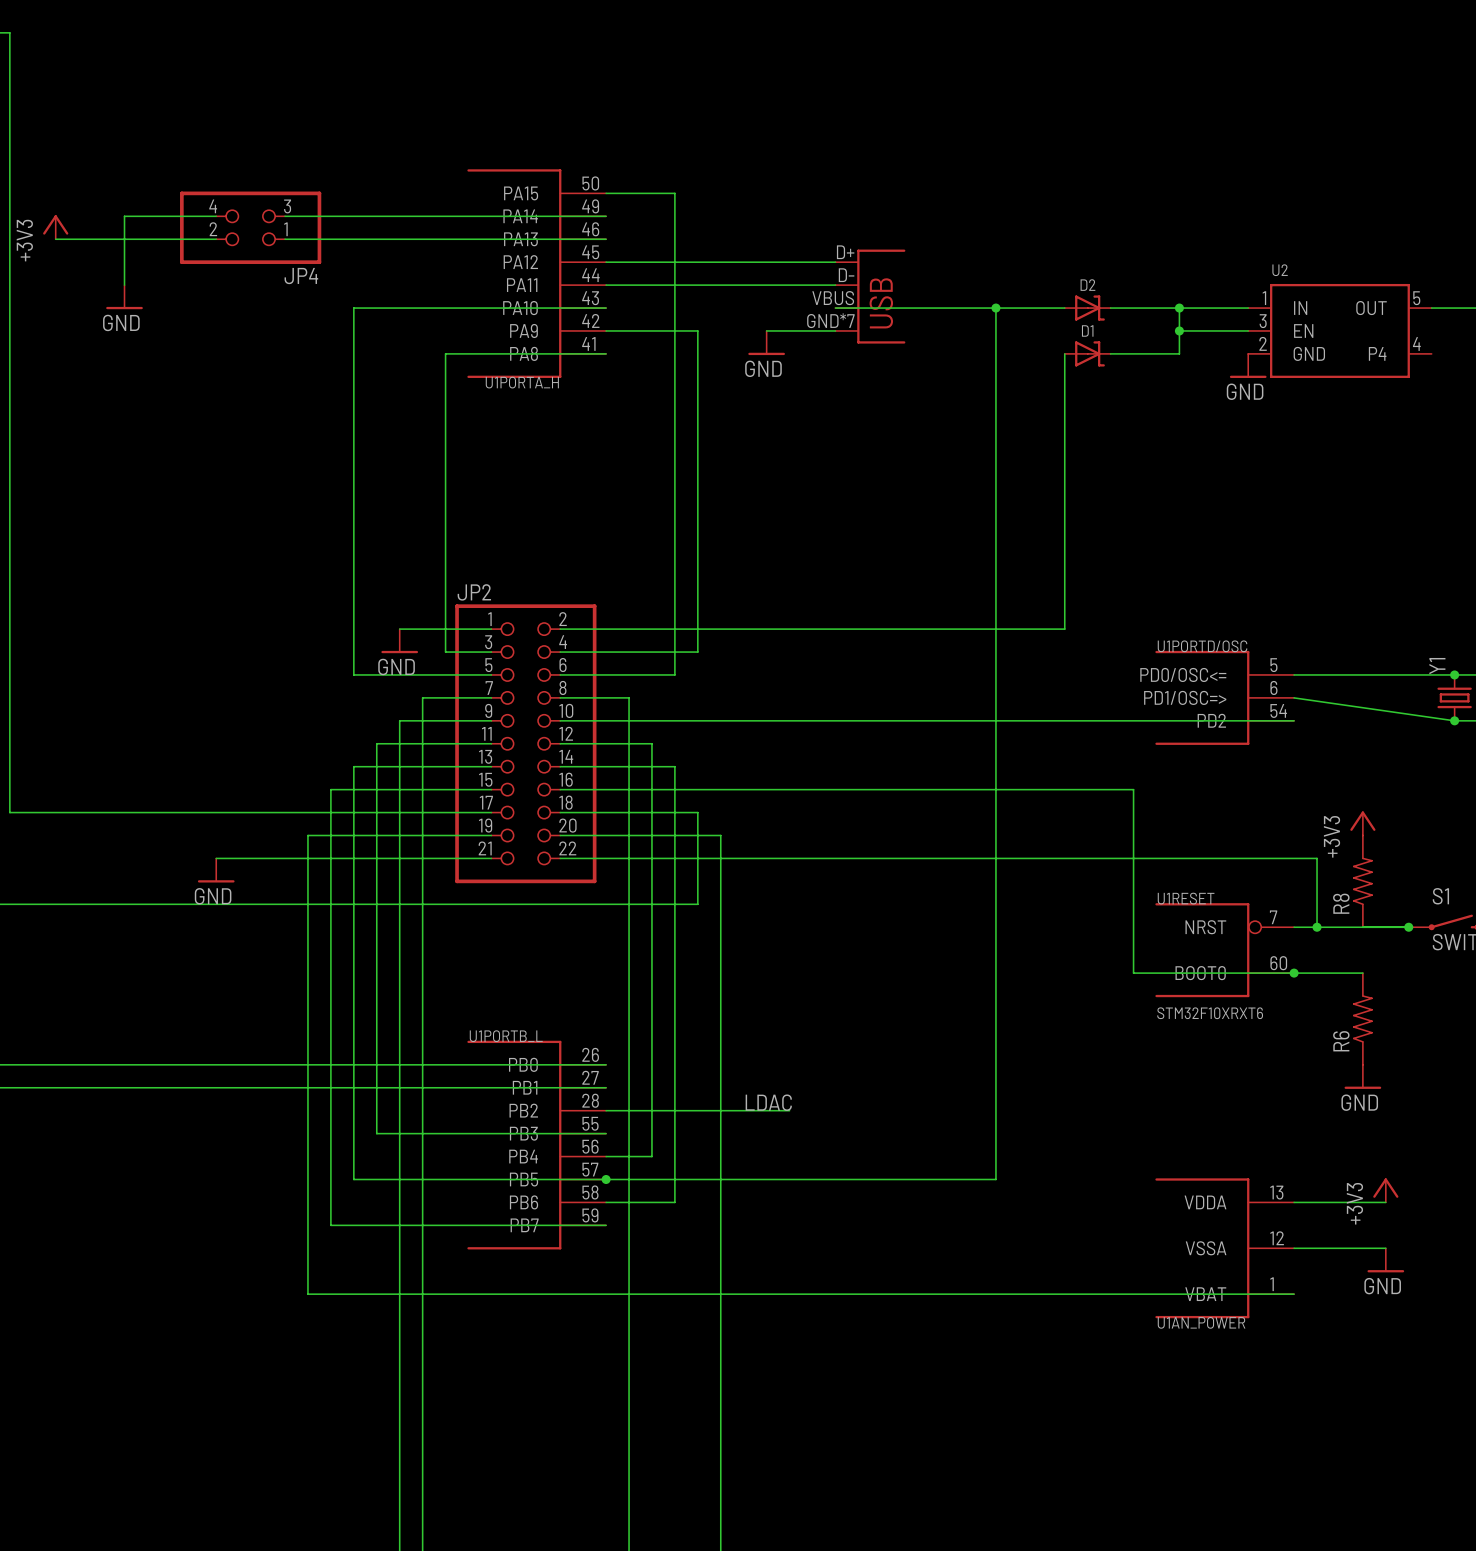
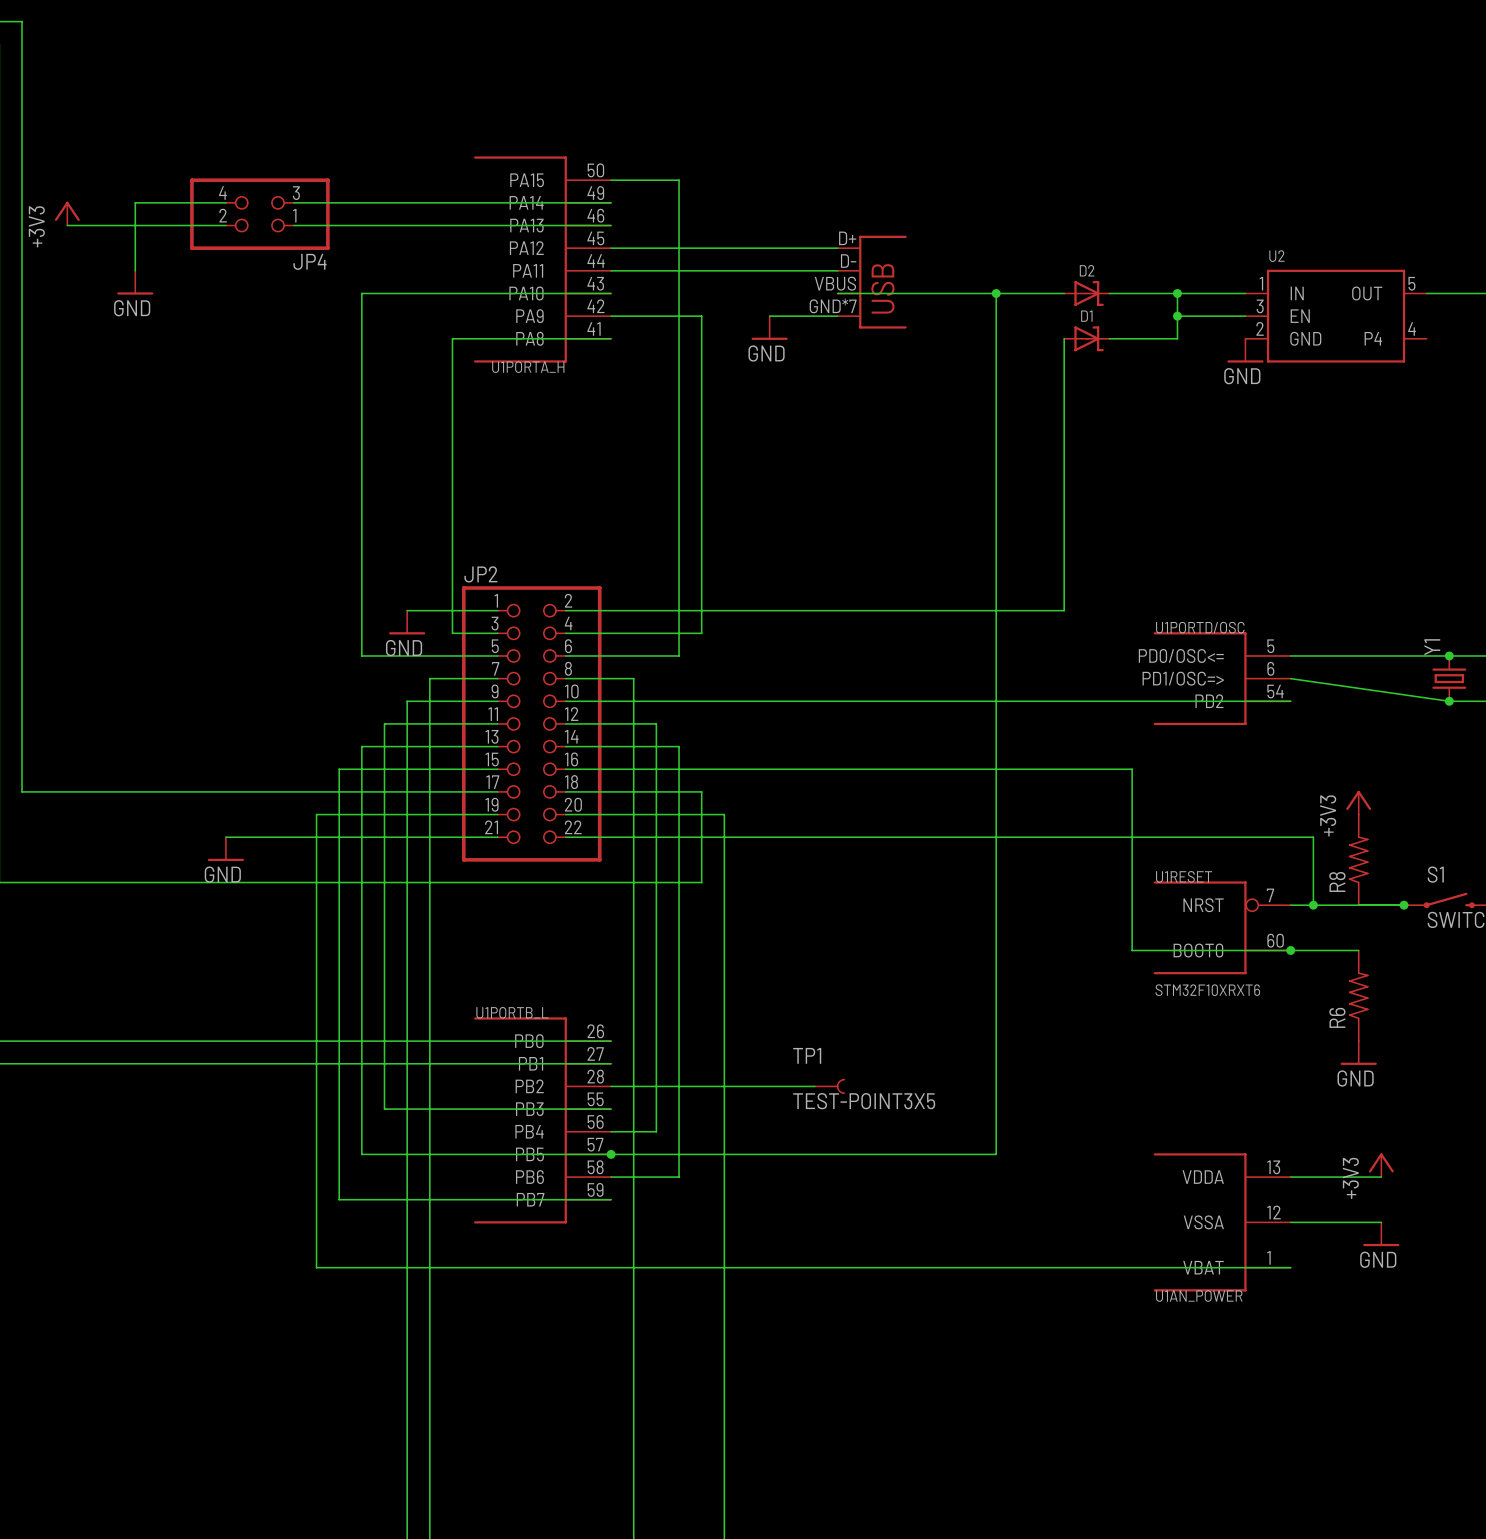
label: LDAC (768, 1102) -> none
wire: none -> (792, 1086) (814, 1086)
TP1: none -> TEST-POINT3X5 (829, 1086)

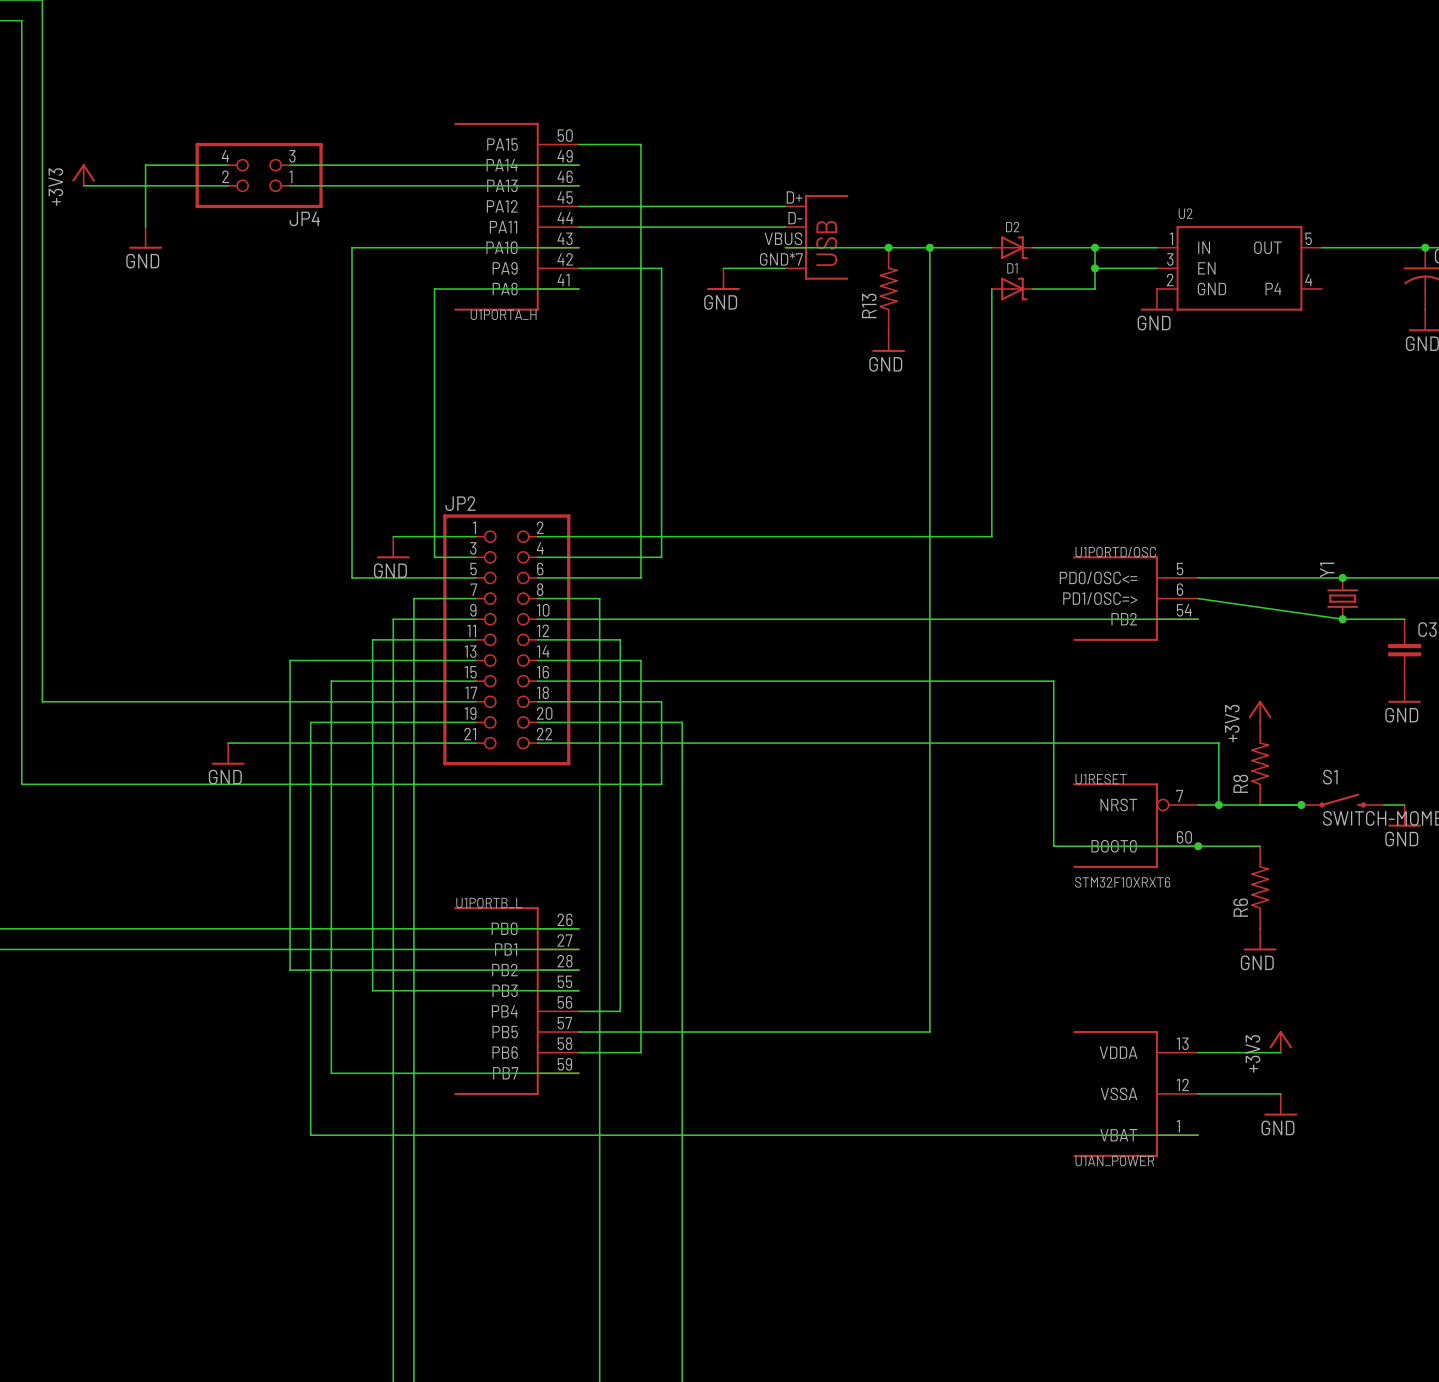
junction: none -> (888, 247)
R13: none -> (888, 289)
power symbol: none -> GND (888, 341)
wire: (361, 746) (361, 1154) (611, 1154) -> (351, 660) (290, 660) (290, 970) (579, 970)
wire: (611, 1086) (814, 1086) -> none
TP1: TEST-POINT3X5 (829, 1086) -> none
junction: (611, 1154) -> none

